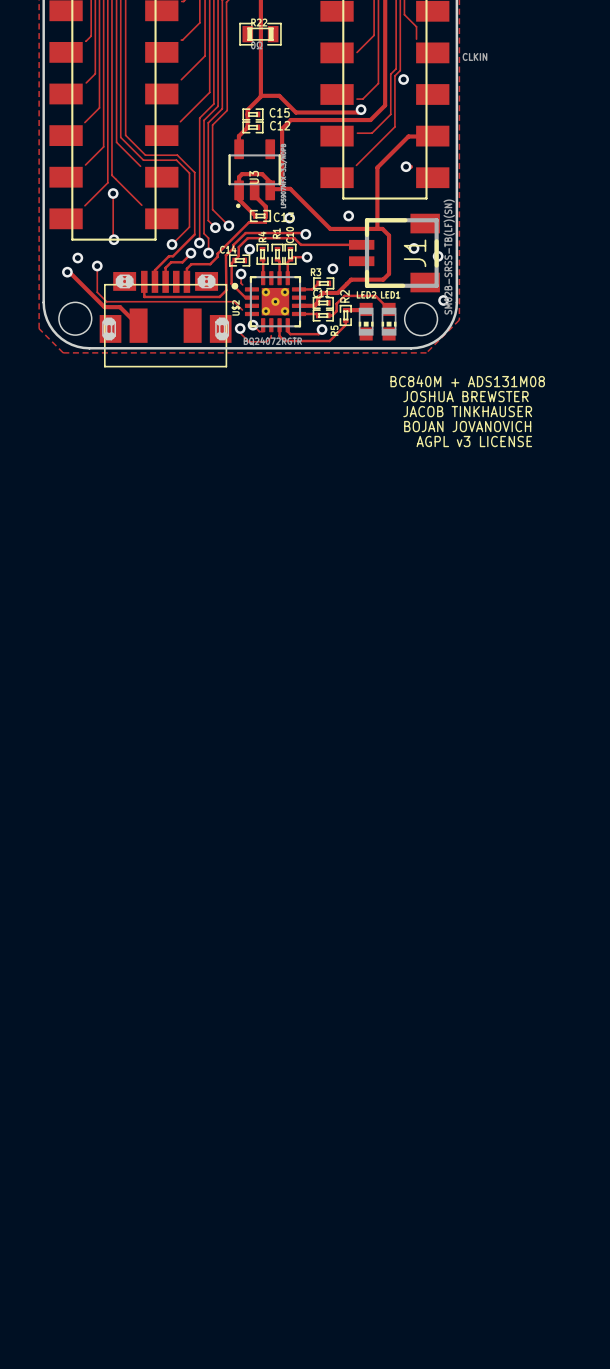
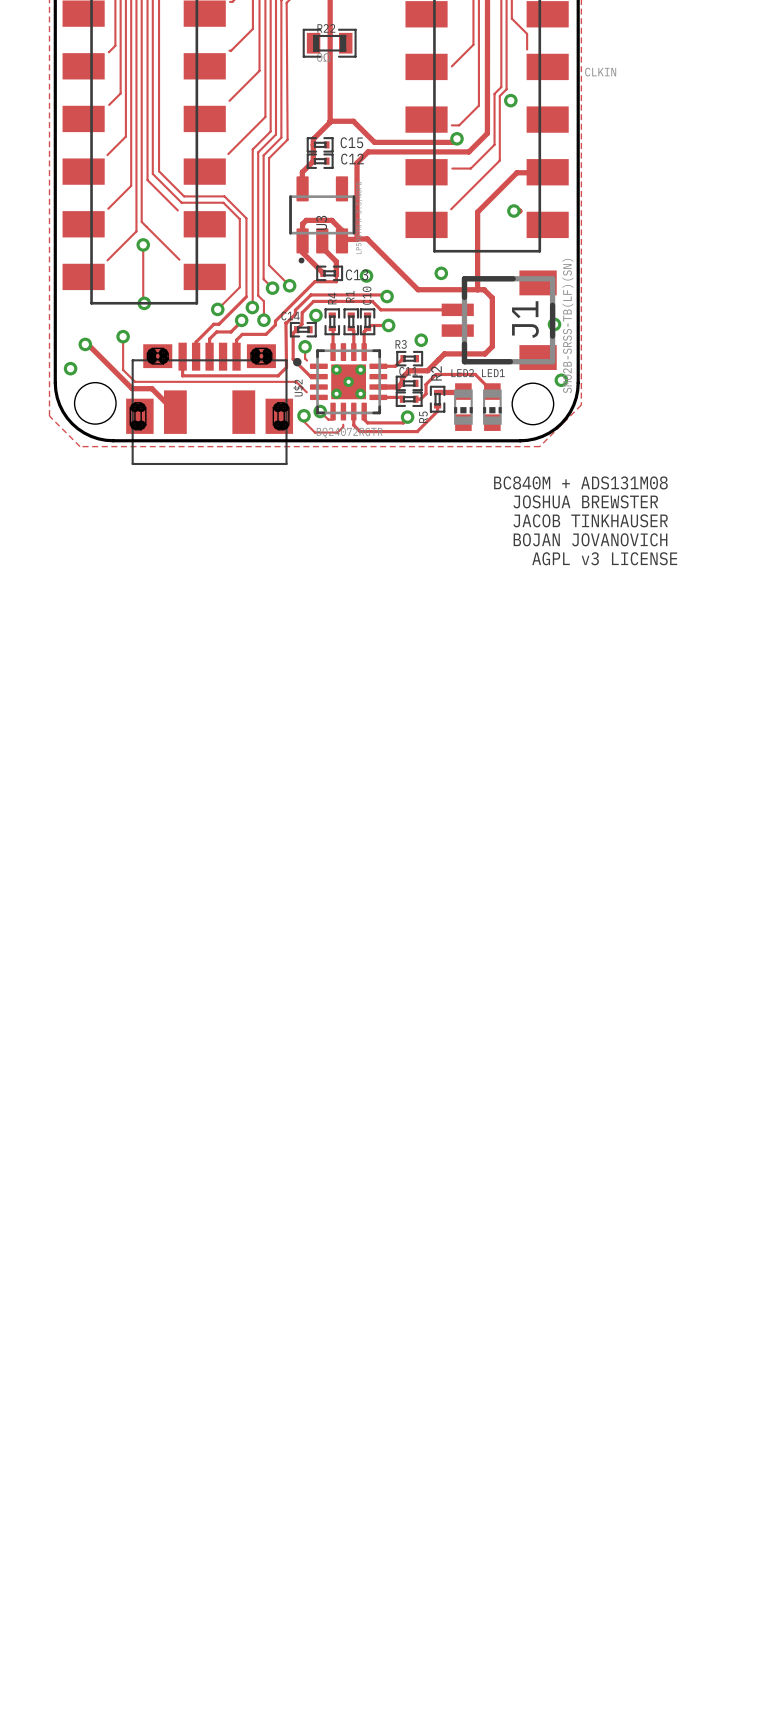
via: (414, 248) -> none
via position: (77, 258) -> (70, 368)

